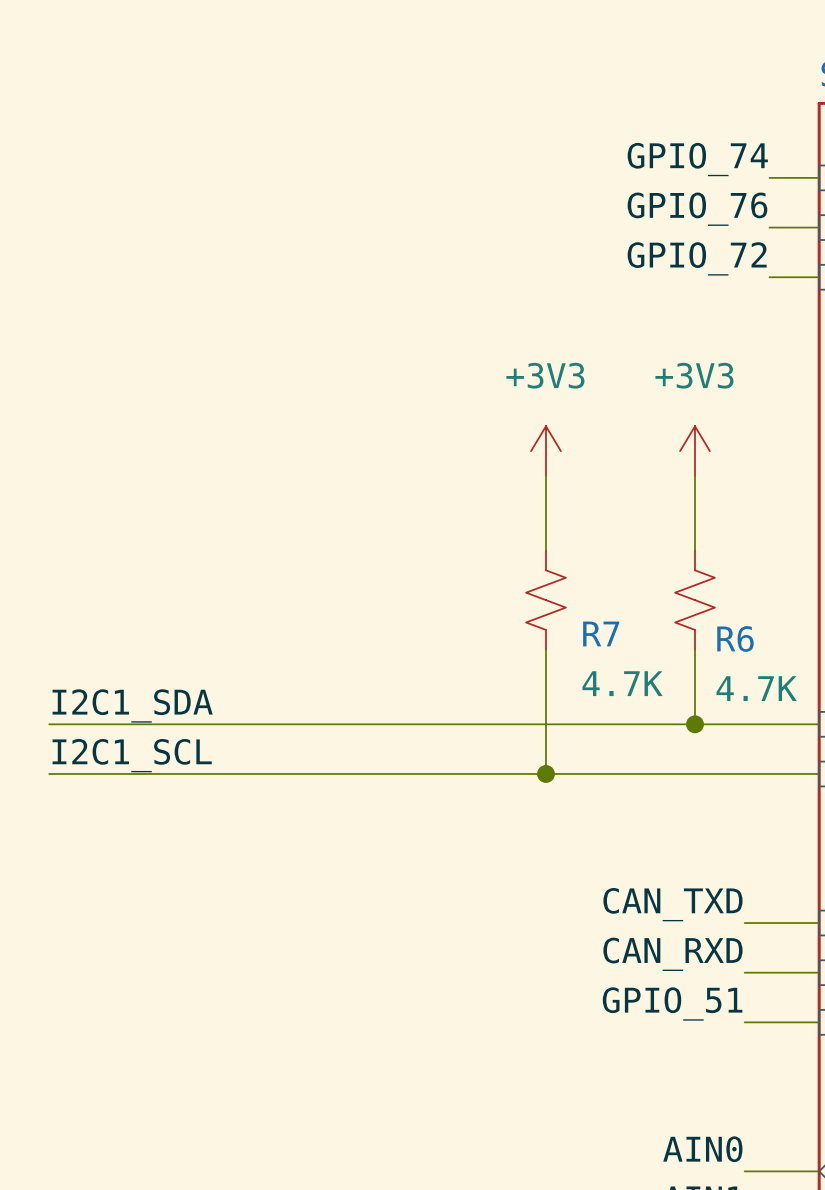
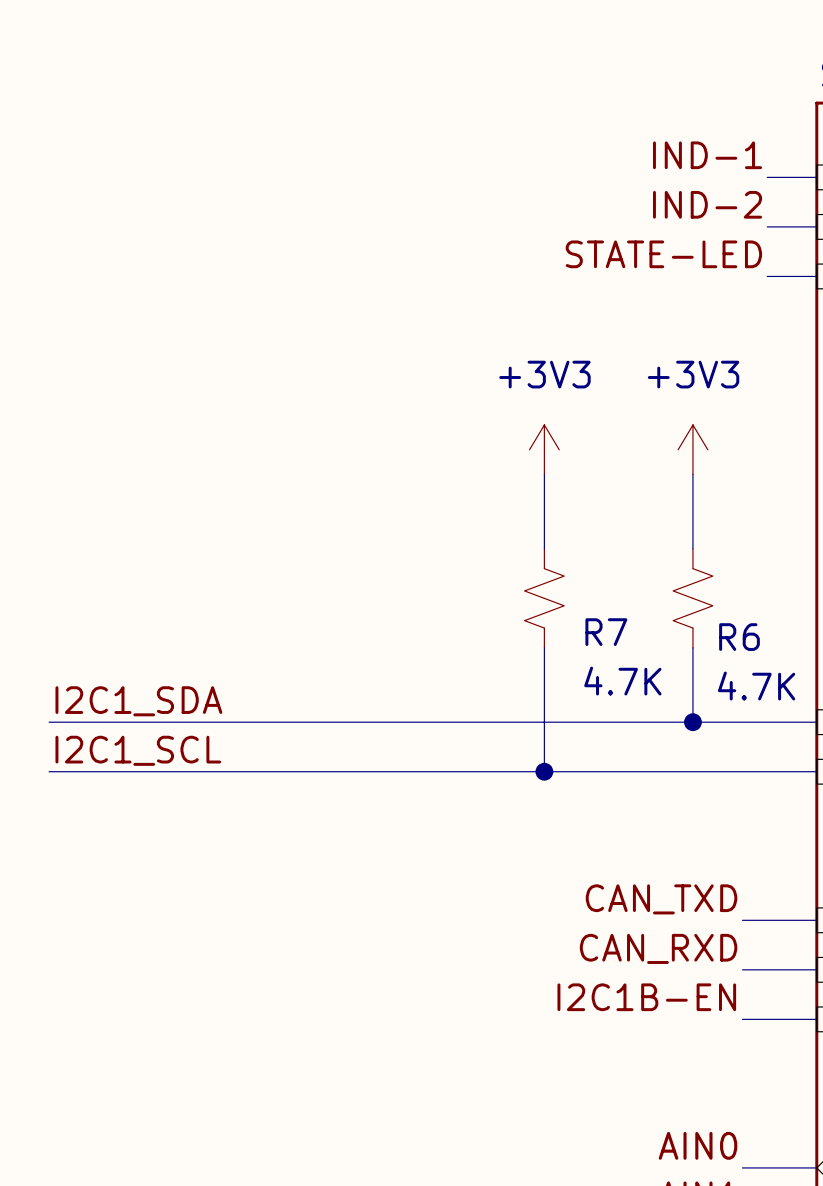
label: GPIO_74 (697, 159) -> IND-1 (707, 155)
label: GPIO_76 (697, 209) -> IND-2 (707, 204)
label: GPIO_72 (697, 258) -> STATE-LED (663, 254)
label: GPIO_51 (672, 1003) -> I2C1B-EN (646, 997)

